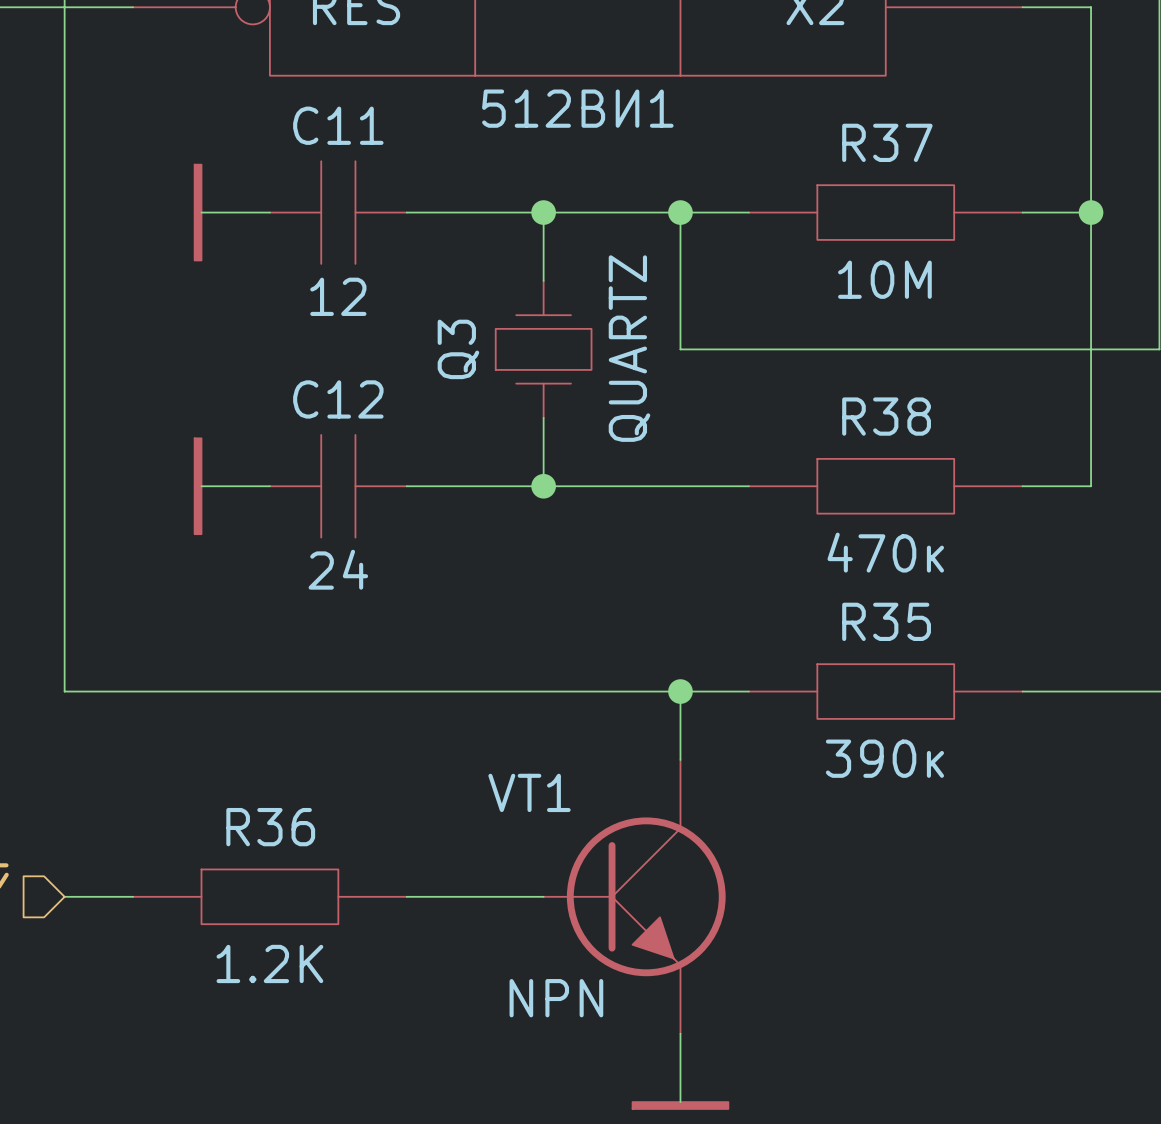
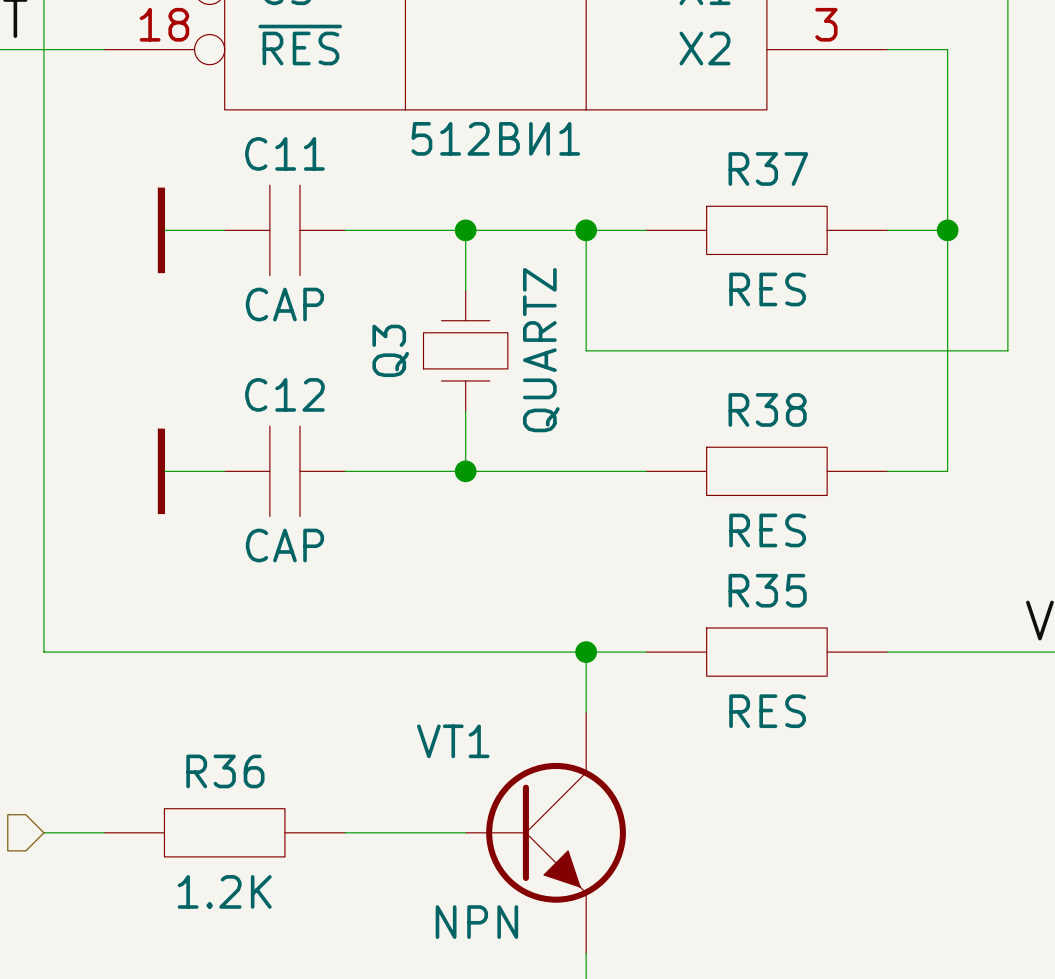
R37 value: 10М (884, 279) -> RES (767, 289)
C11 value: 12 (338, 296) -> CAP (284, 304)
R38 value: 470к (885, 552) -> RES (767, 530)
C12 value: 24 (338, 569) -> CAP (284, 545)
R35 value: 390к (884, 758) -> RES (767, 711)

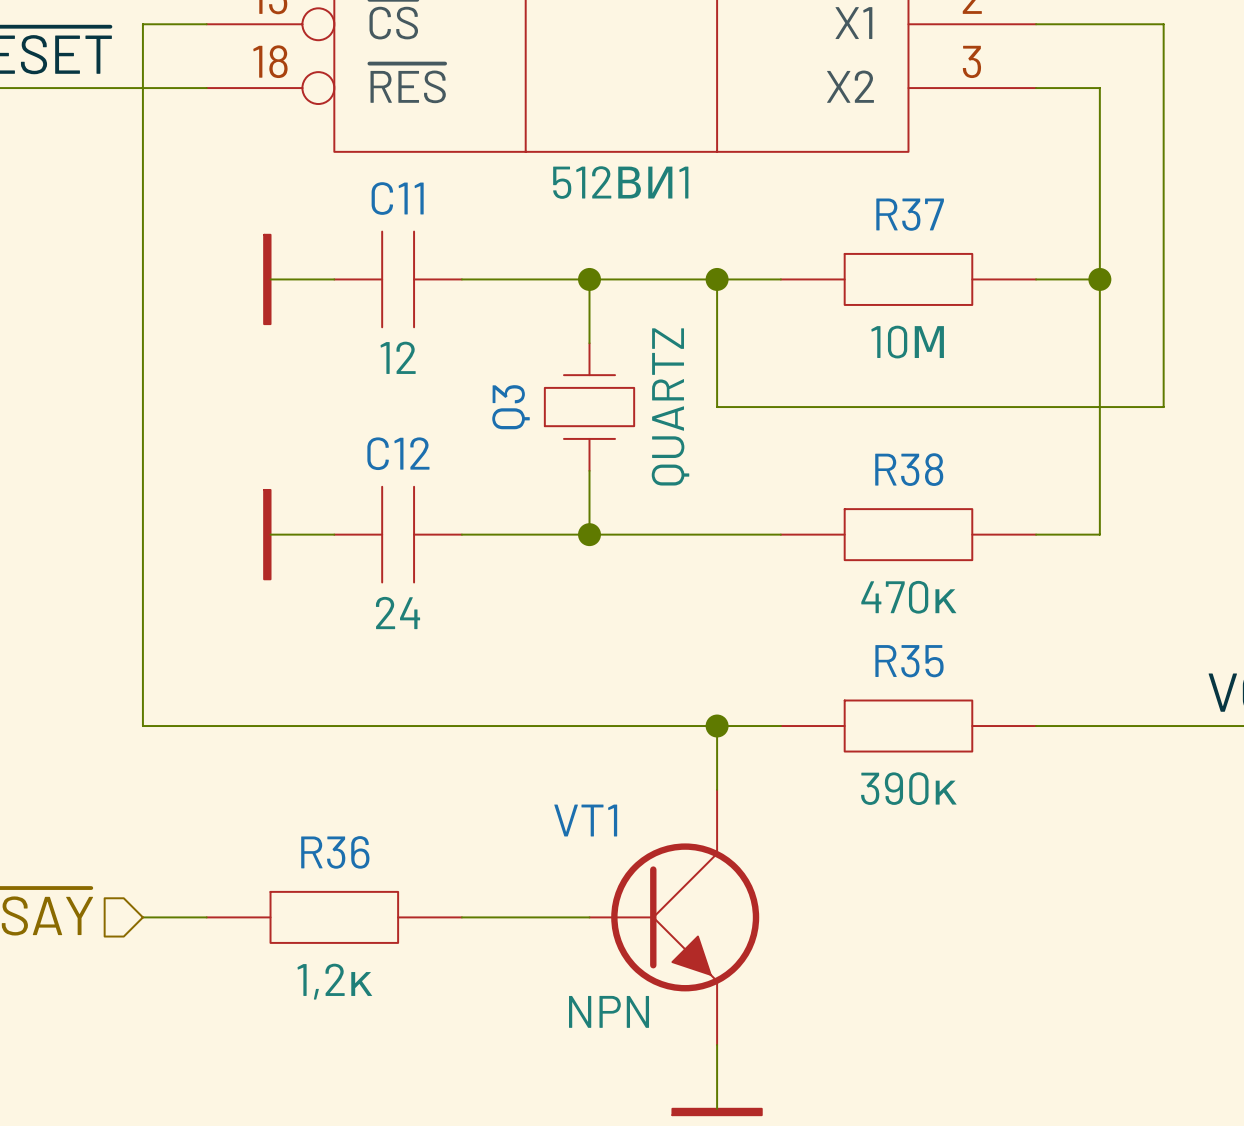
R37 value: RES (767, 289) -> 10М (907, 342)
C11 value: CAP (284, 304) -> 12 (398, 357)
R38 value: RES (767, 530) -> 470к (908, 597)
C12 value: CAP (284, 545) -> 24 (398, 613)
R35 value: RES (767, 711) -> 390к (908, 788)
R36 value: 1.2K (224, 891) -> 1,2к (334, 981)

